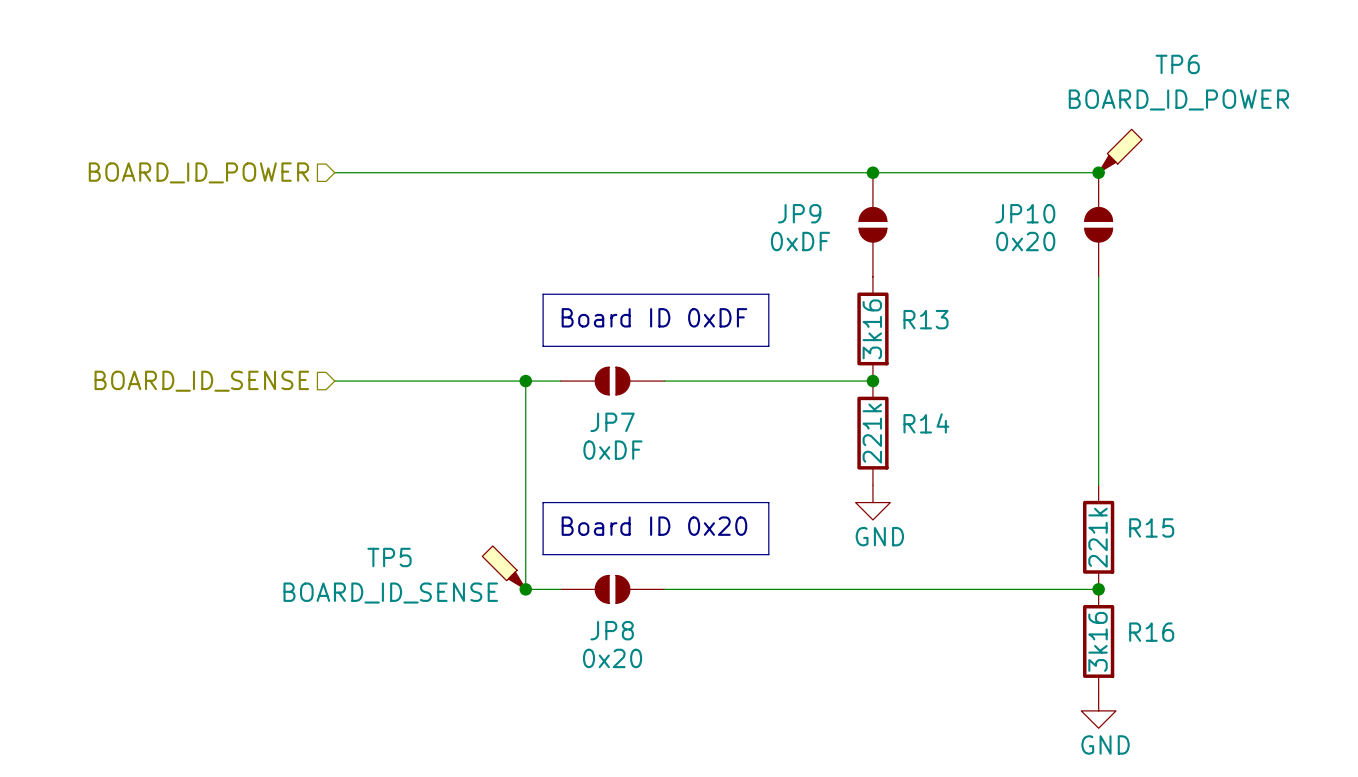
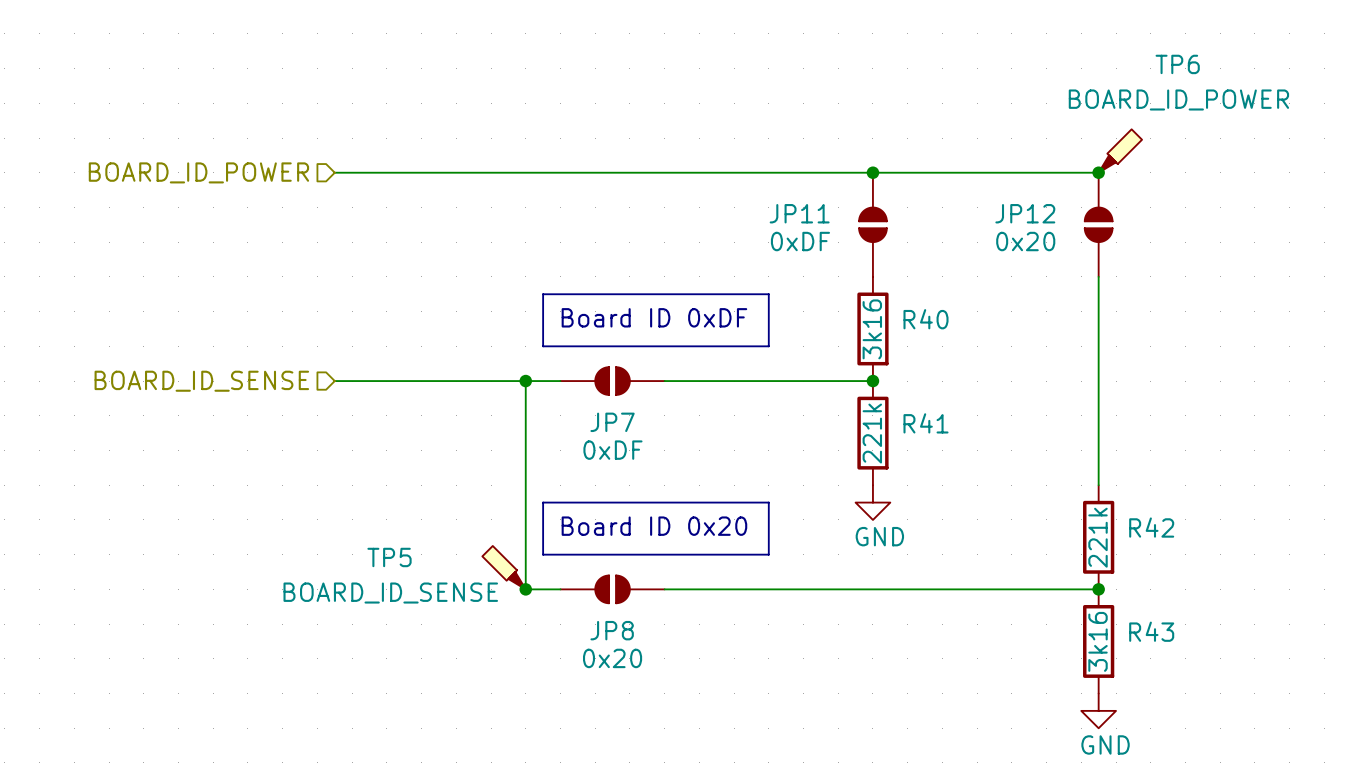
JP9 name: JP9 (799, 213) -> JP11 (799, 213)
JP10 name: JP10 (1025, 213) -> JP12 (1025, 213)
R13 name: R13 (926, 319) -> R40 (926, 319)
R14 name: R14 (926, 423) -> R41 (926, 423)
R15 name: R15 (1151, 527) -> R42 (1151, 527)
R16 name: R16 (1151, 632) -> R43 (1151, 631)

